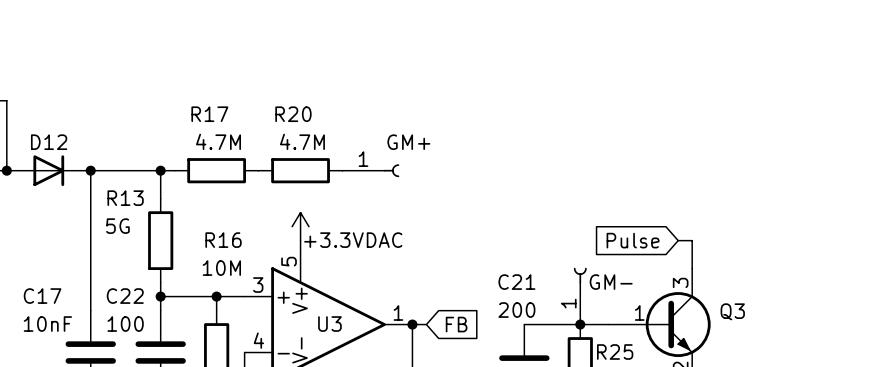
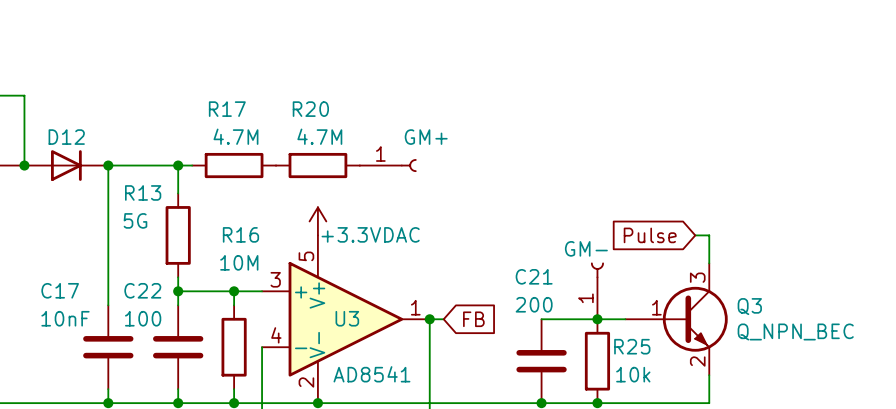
part value position: GM- (611, 282) -> GM- (586, 248)
Q3 value: none -> Q_NPN_BEC (795, 331)

